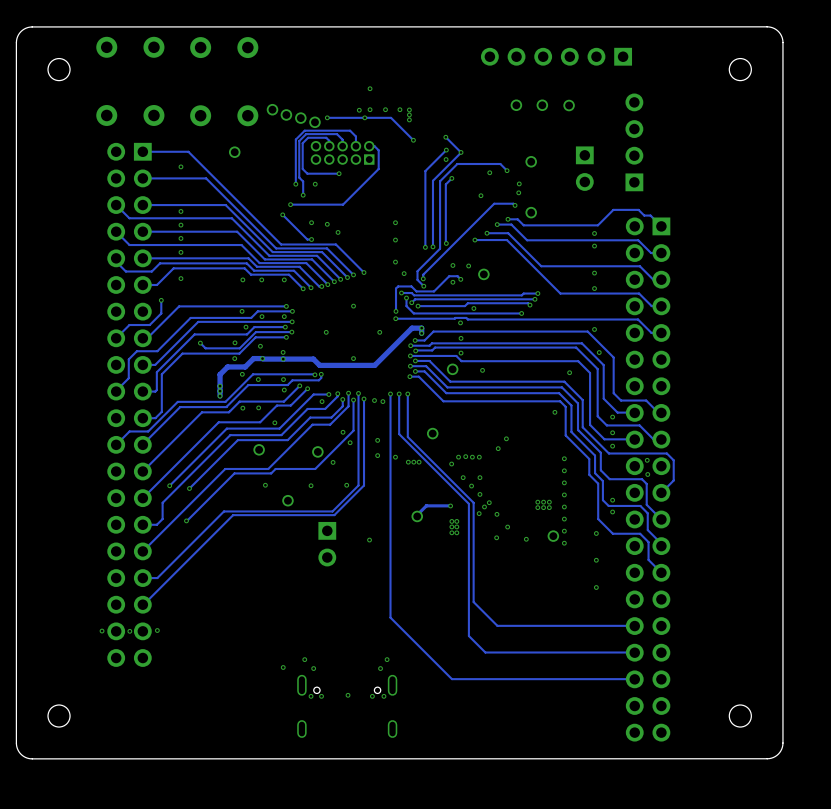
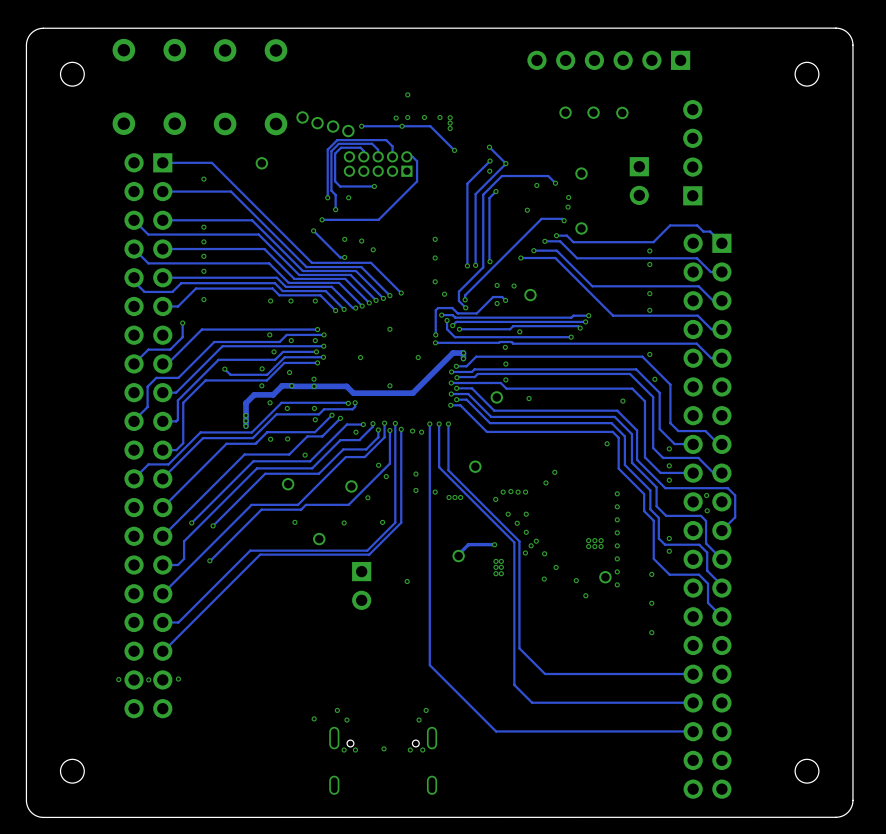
via: none -> (585, 595)

